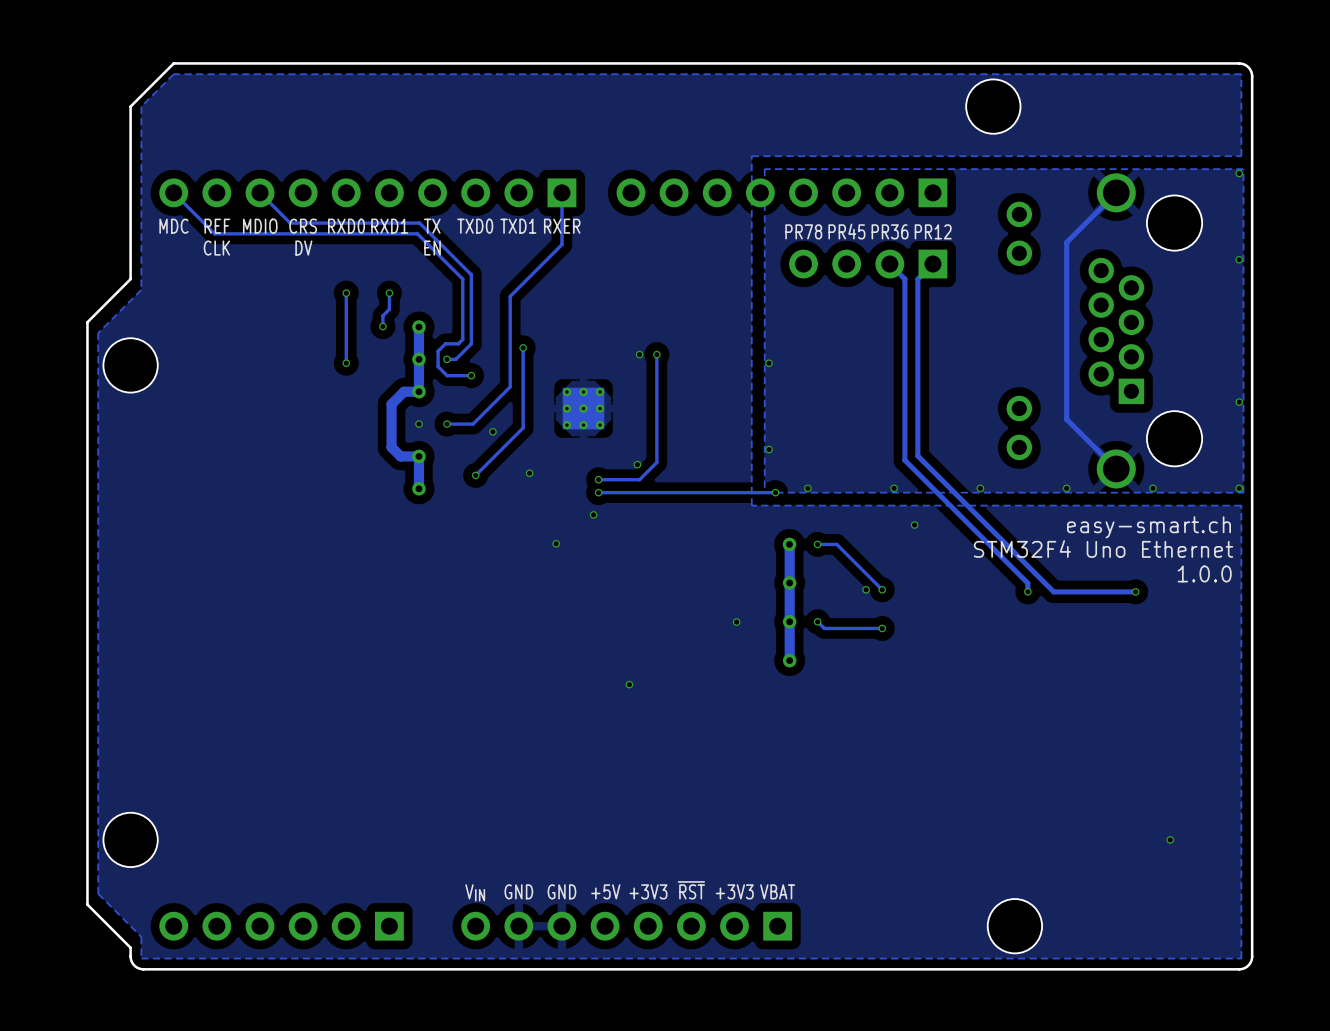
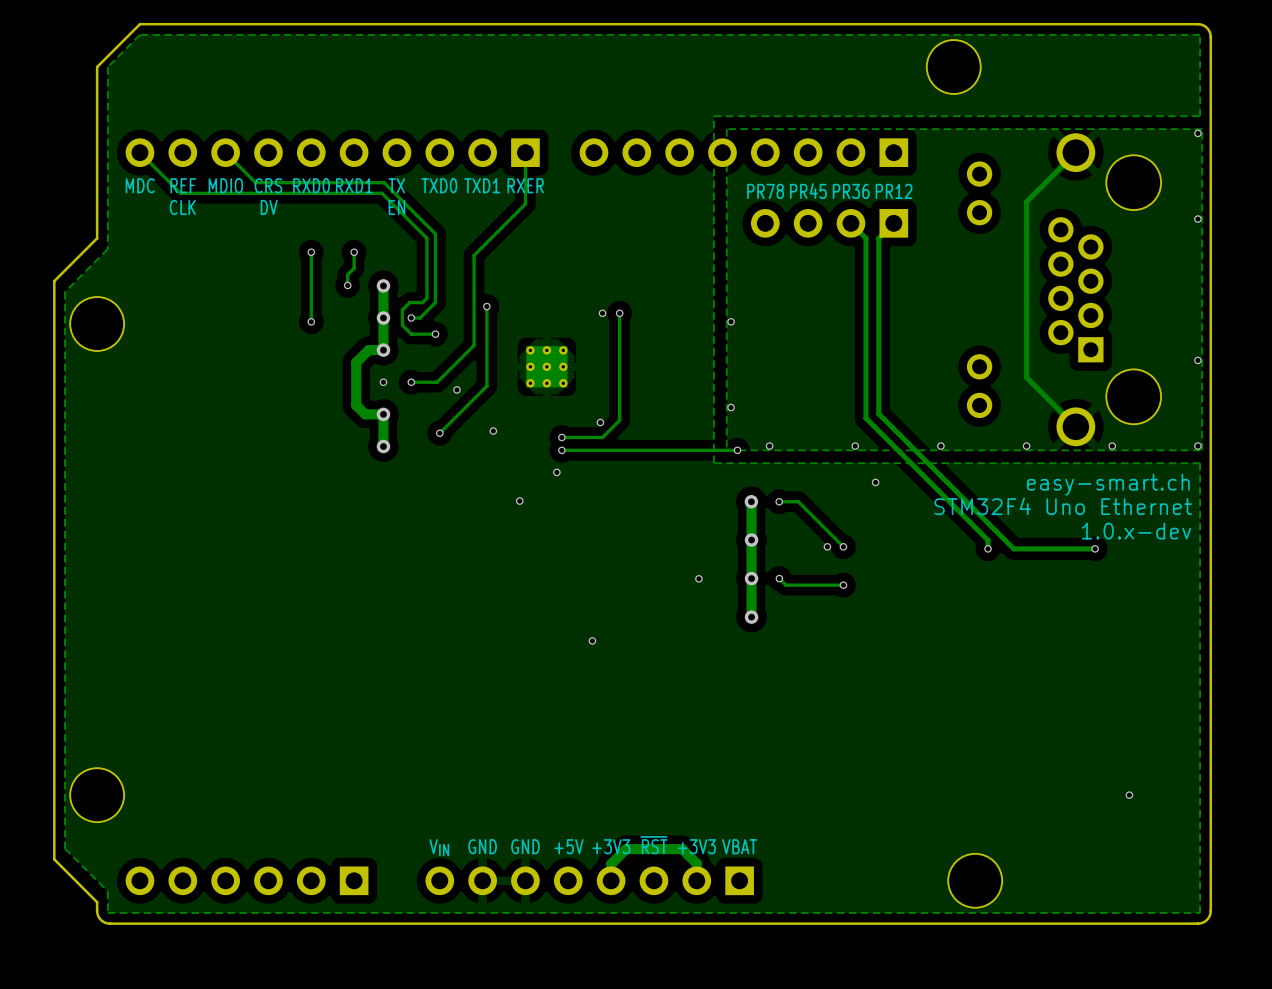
text: 1.0.0 (1204, 573) -> 1.0.x-dev (1136, 531)
track: none -> (696, 880) (696, 863) (682, 849) (626, 849) (611, 864) (611, 880)

